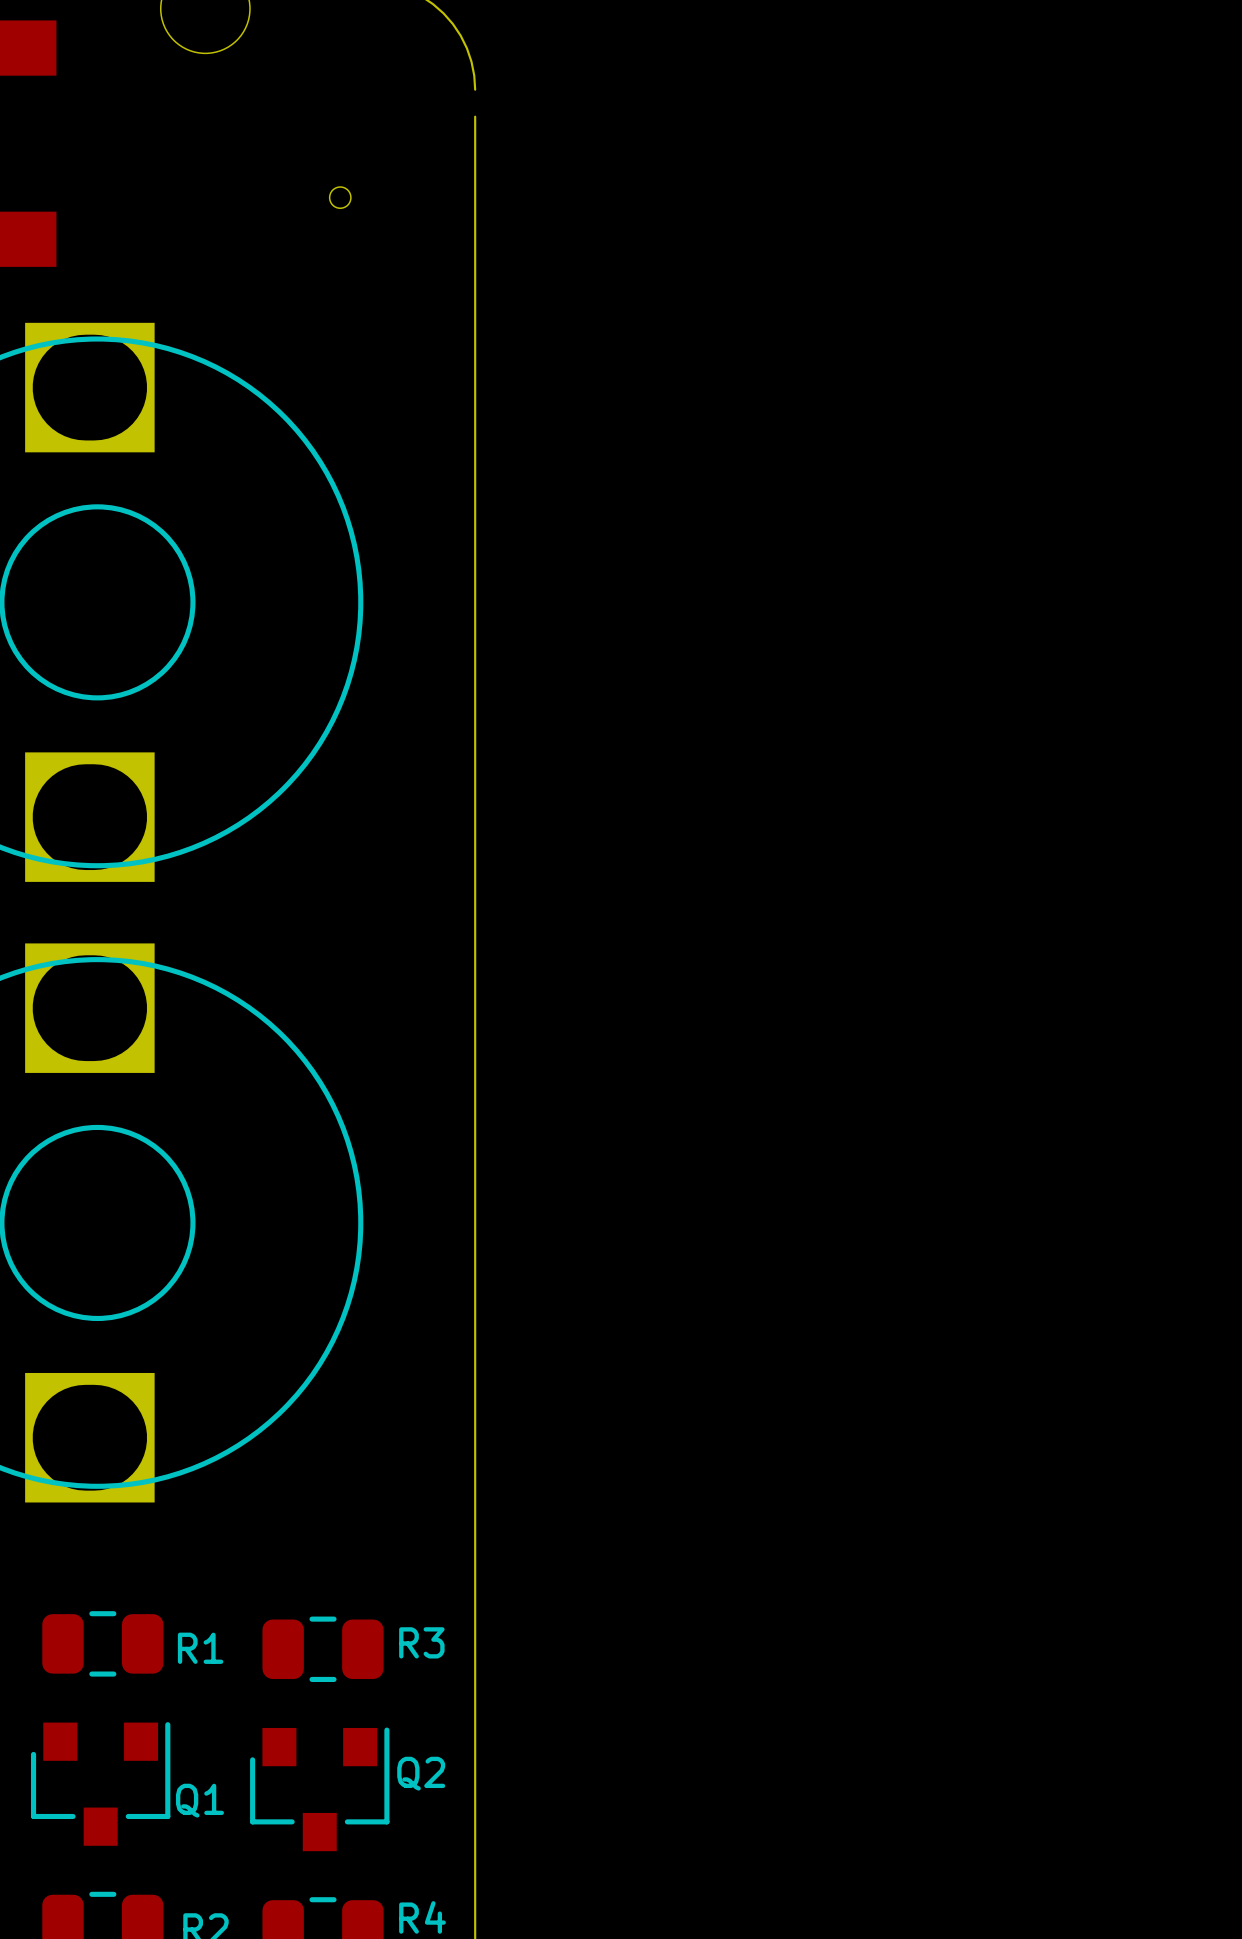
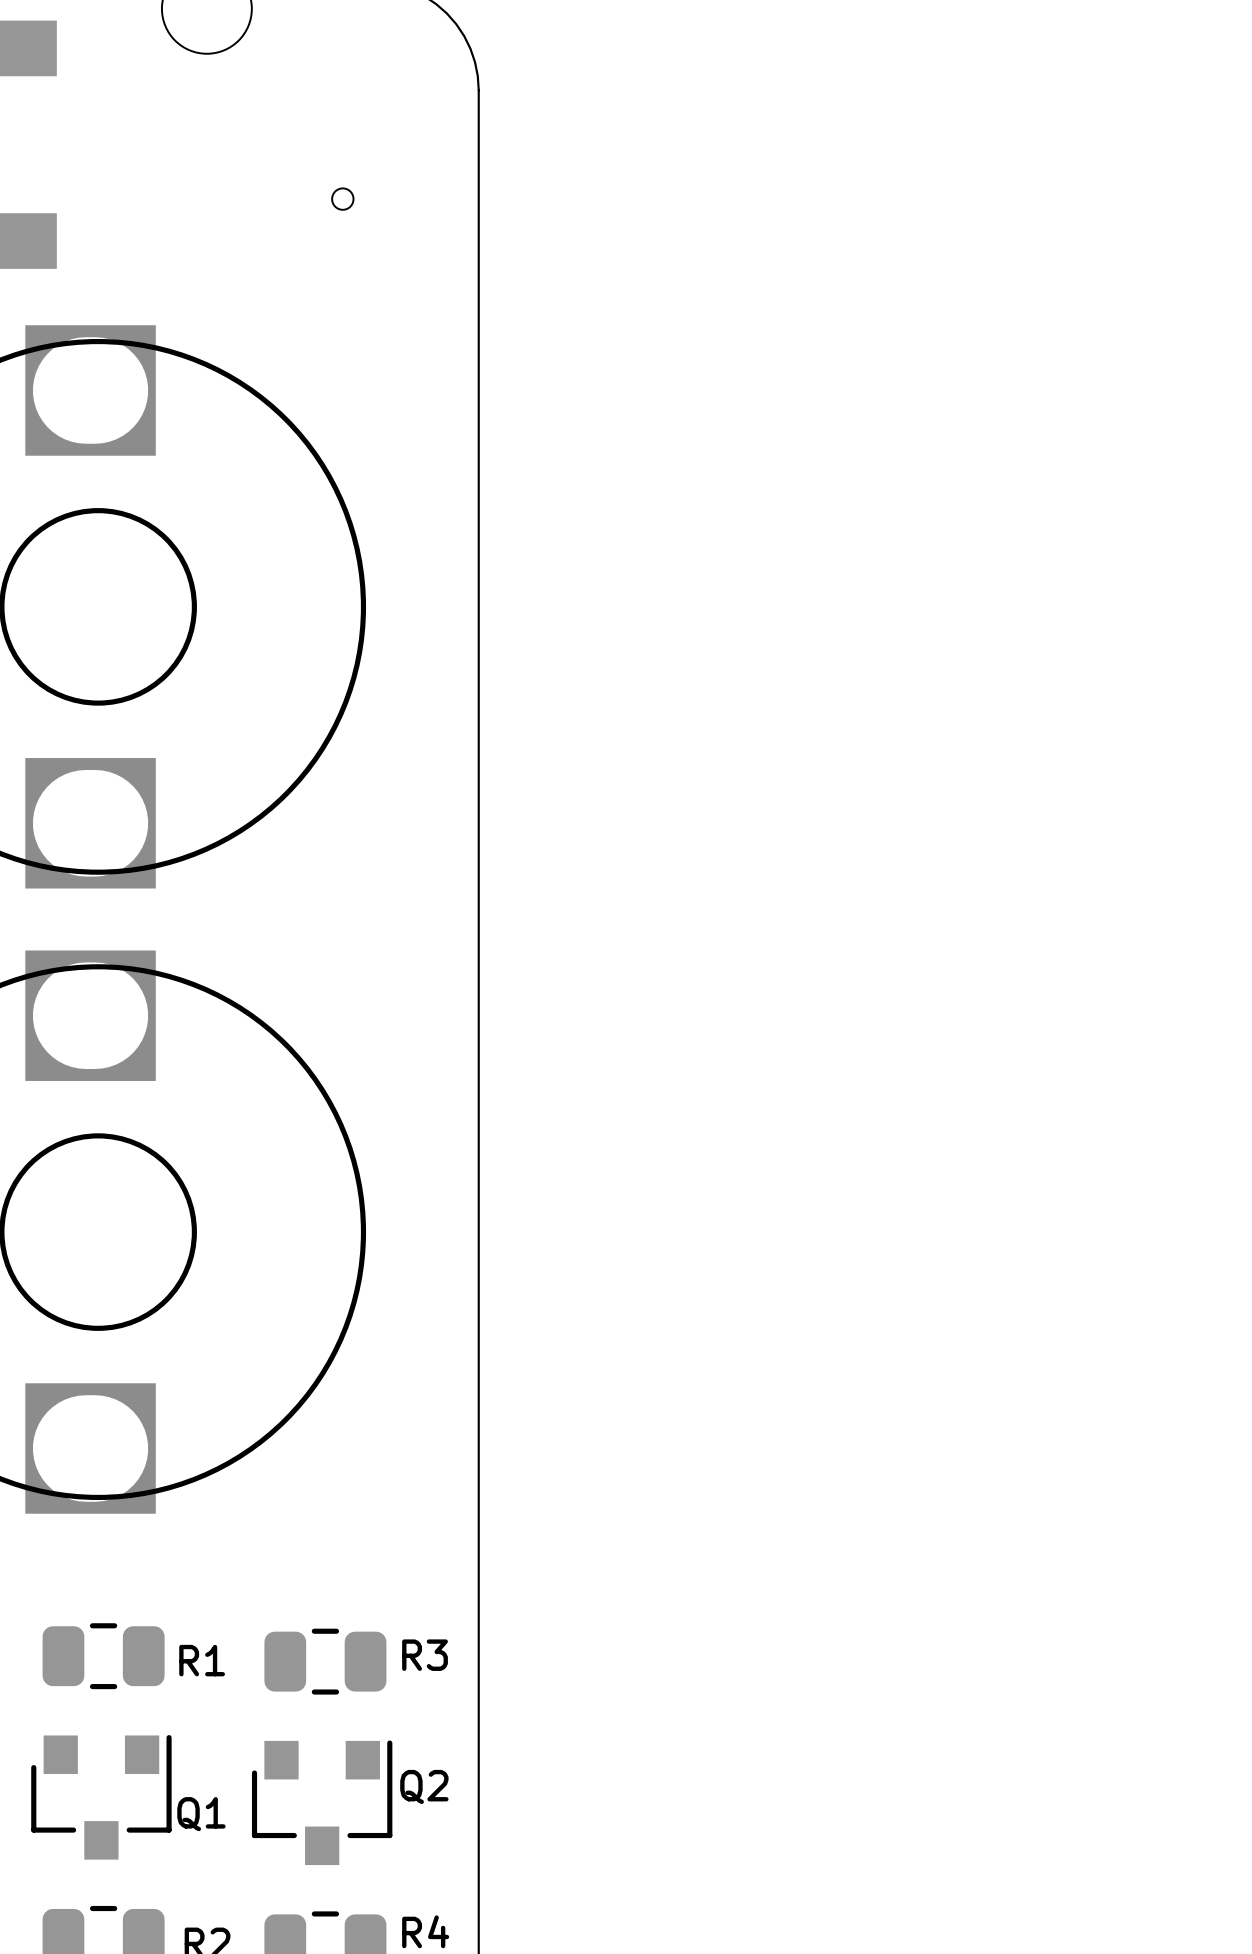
board edge: none -> (478, 90) (478, 117)

